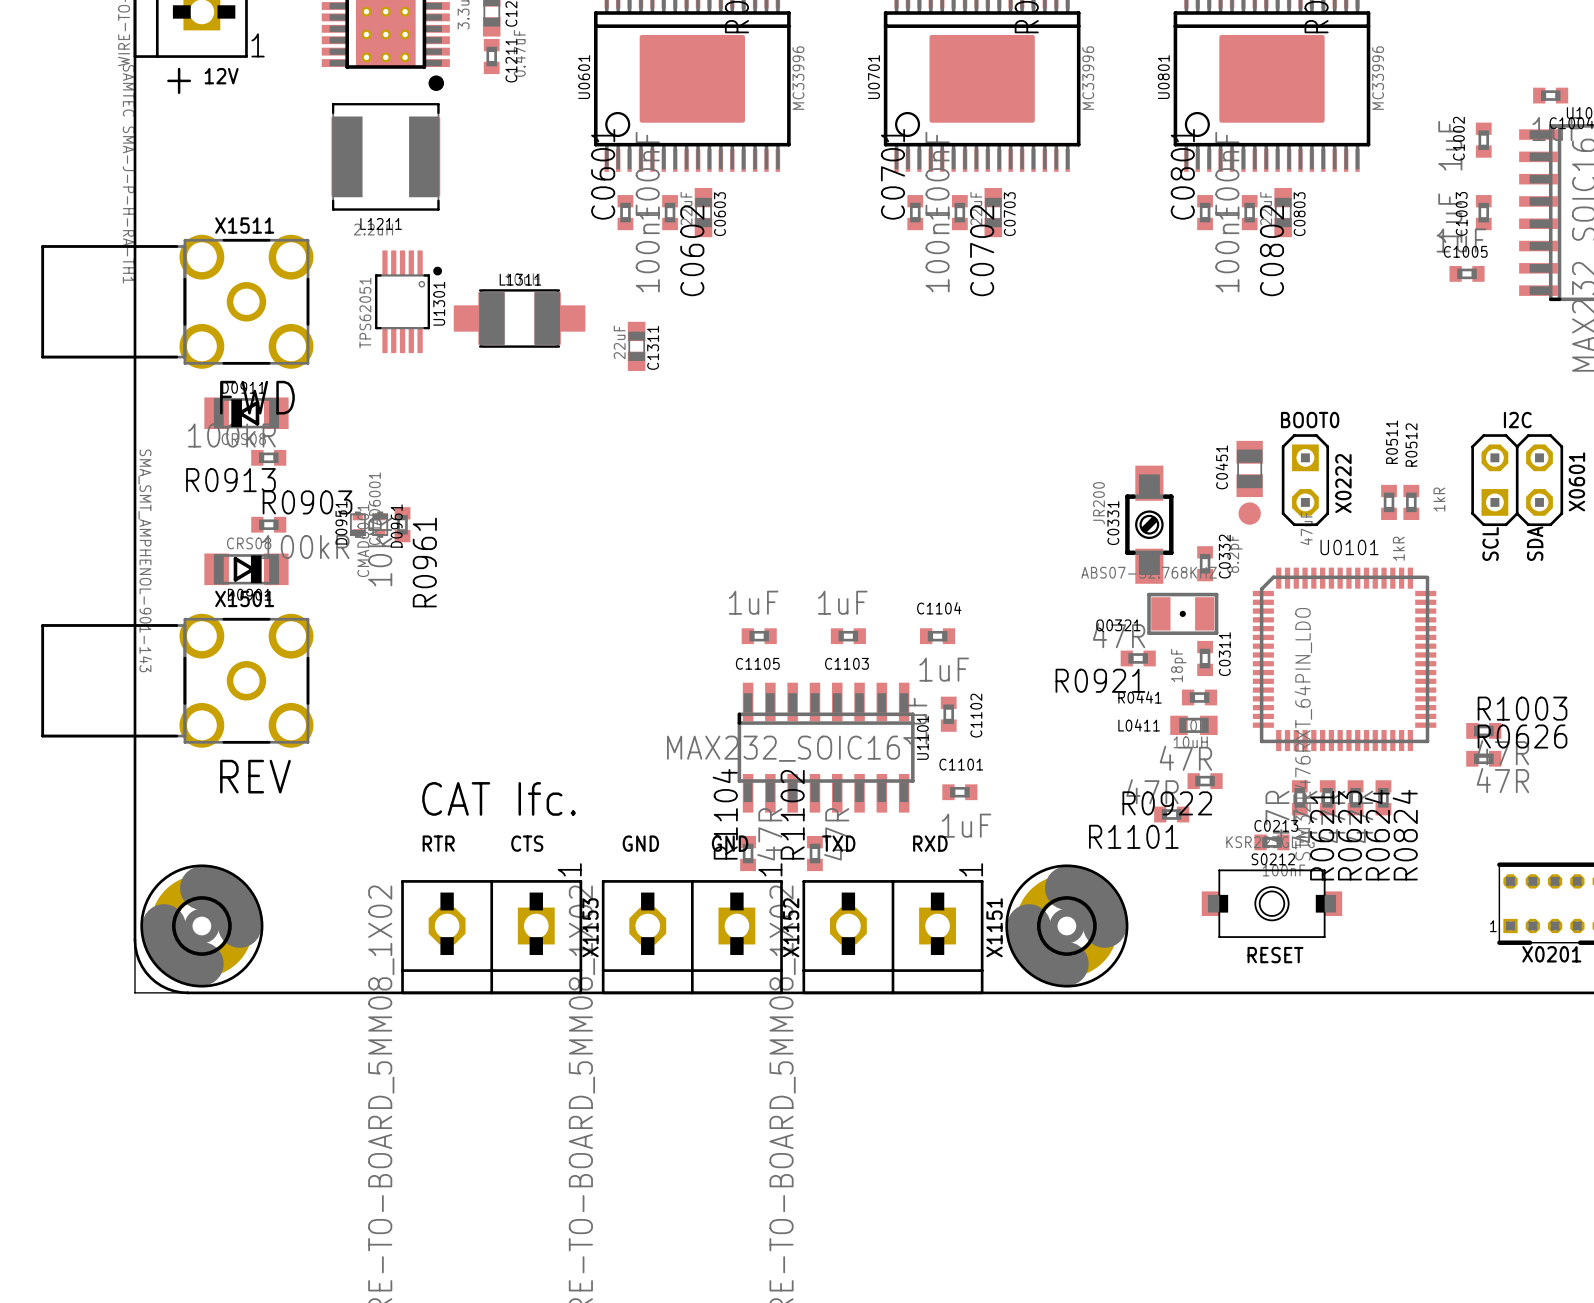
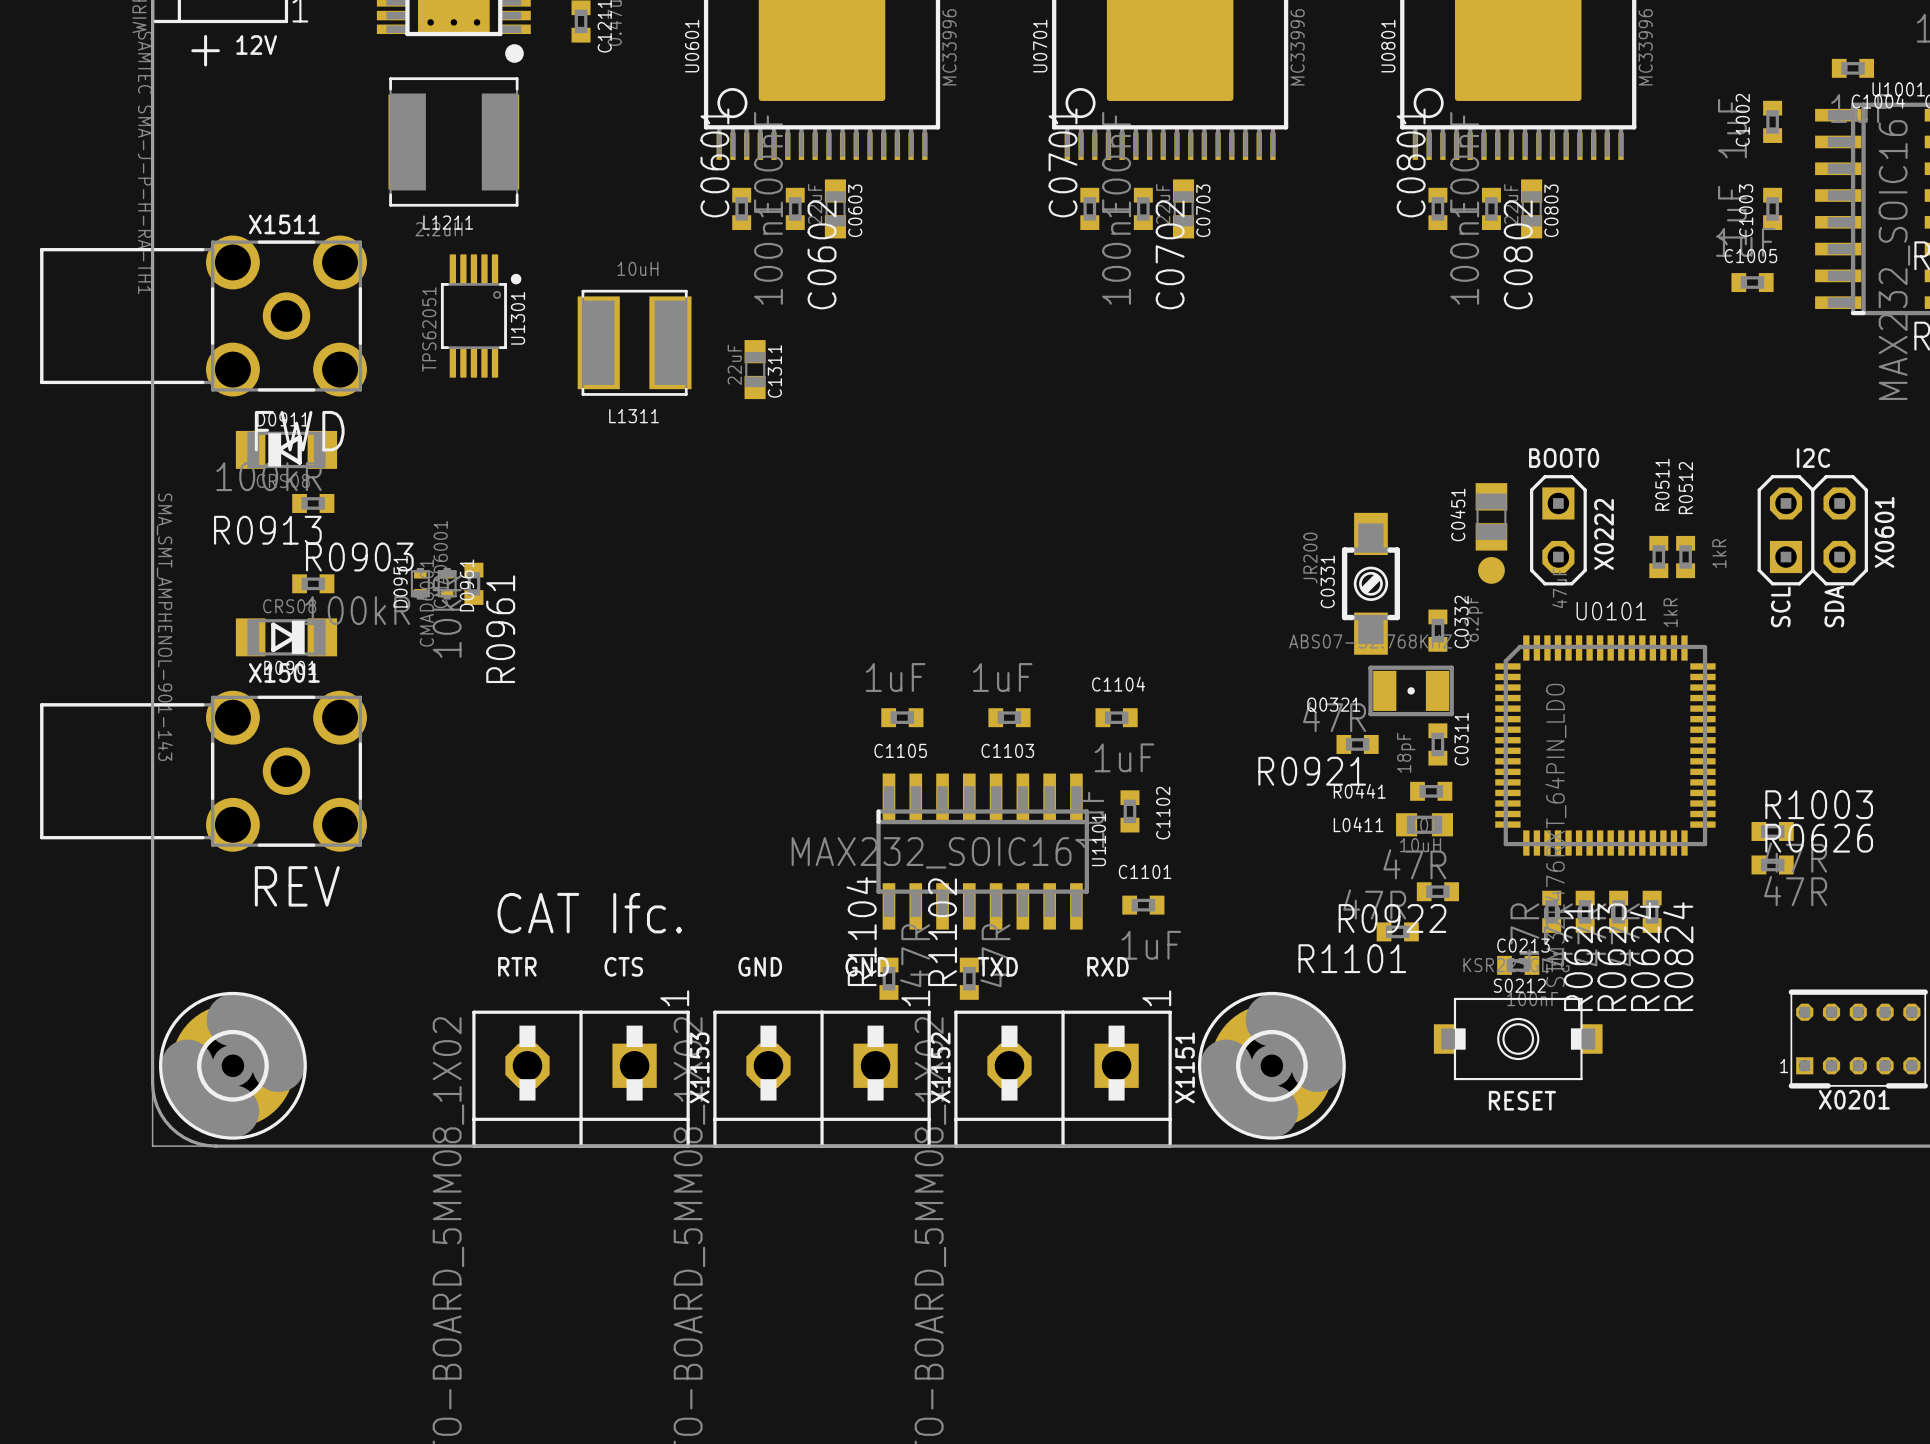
L1311 name position: L1311 (520, 279) -> L1311 (634, 416)
L1311 footprint: [453, 289, 586, 348] -> [577, 289, 692, 396]

